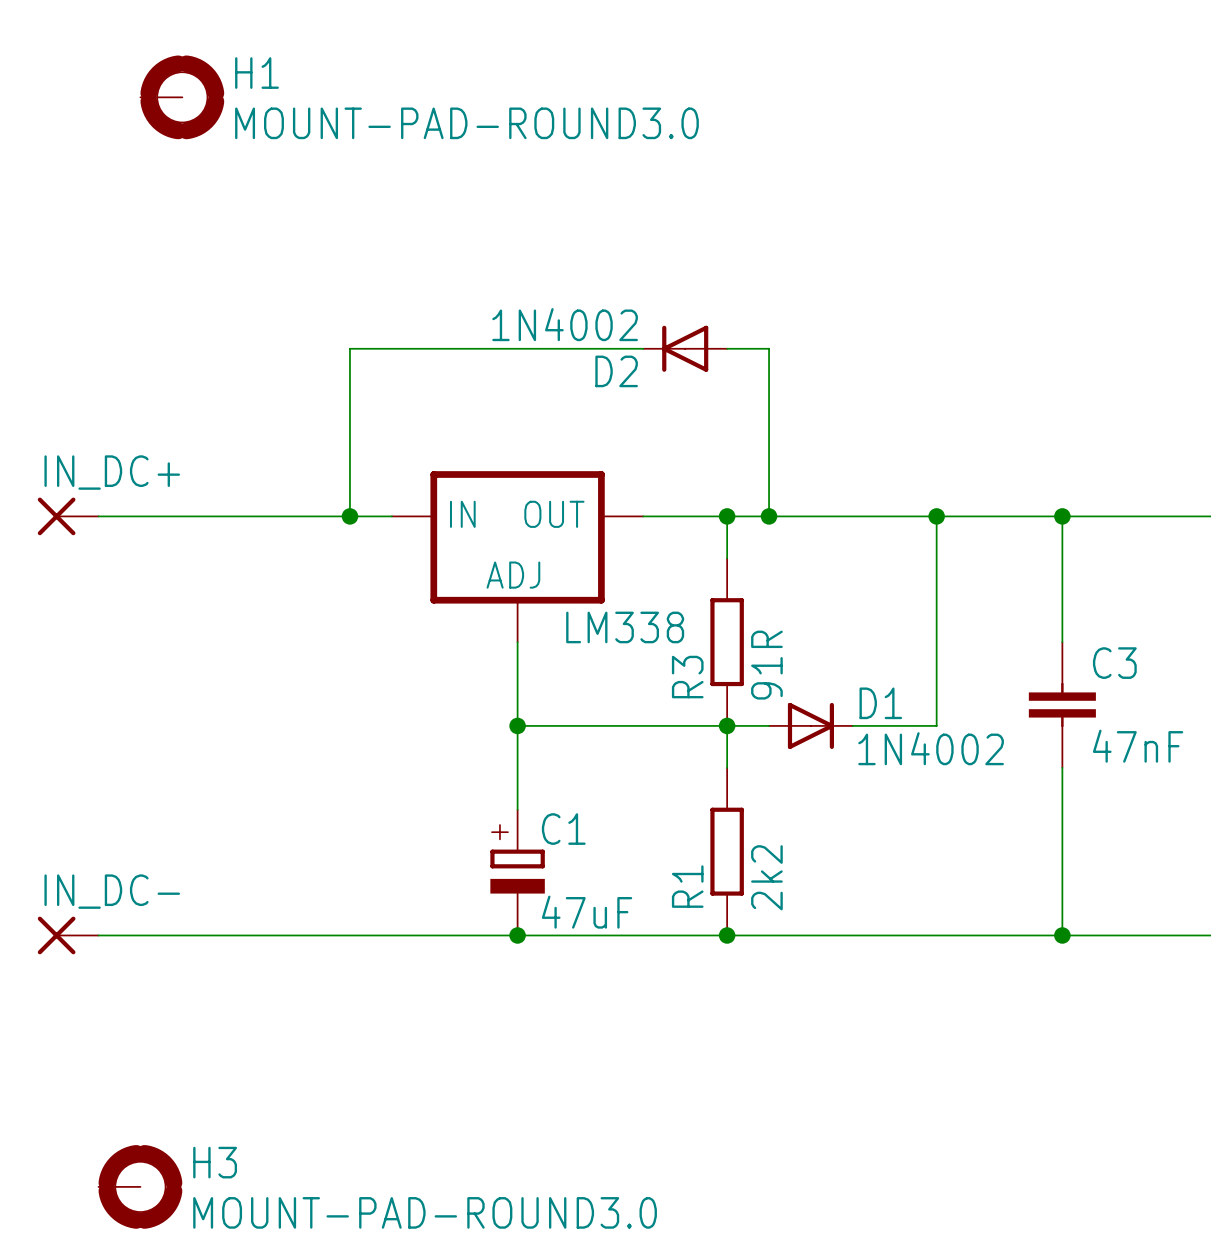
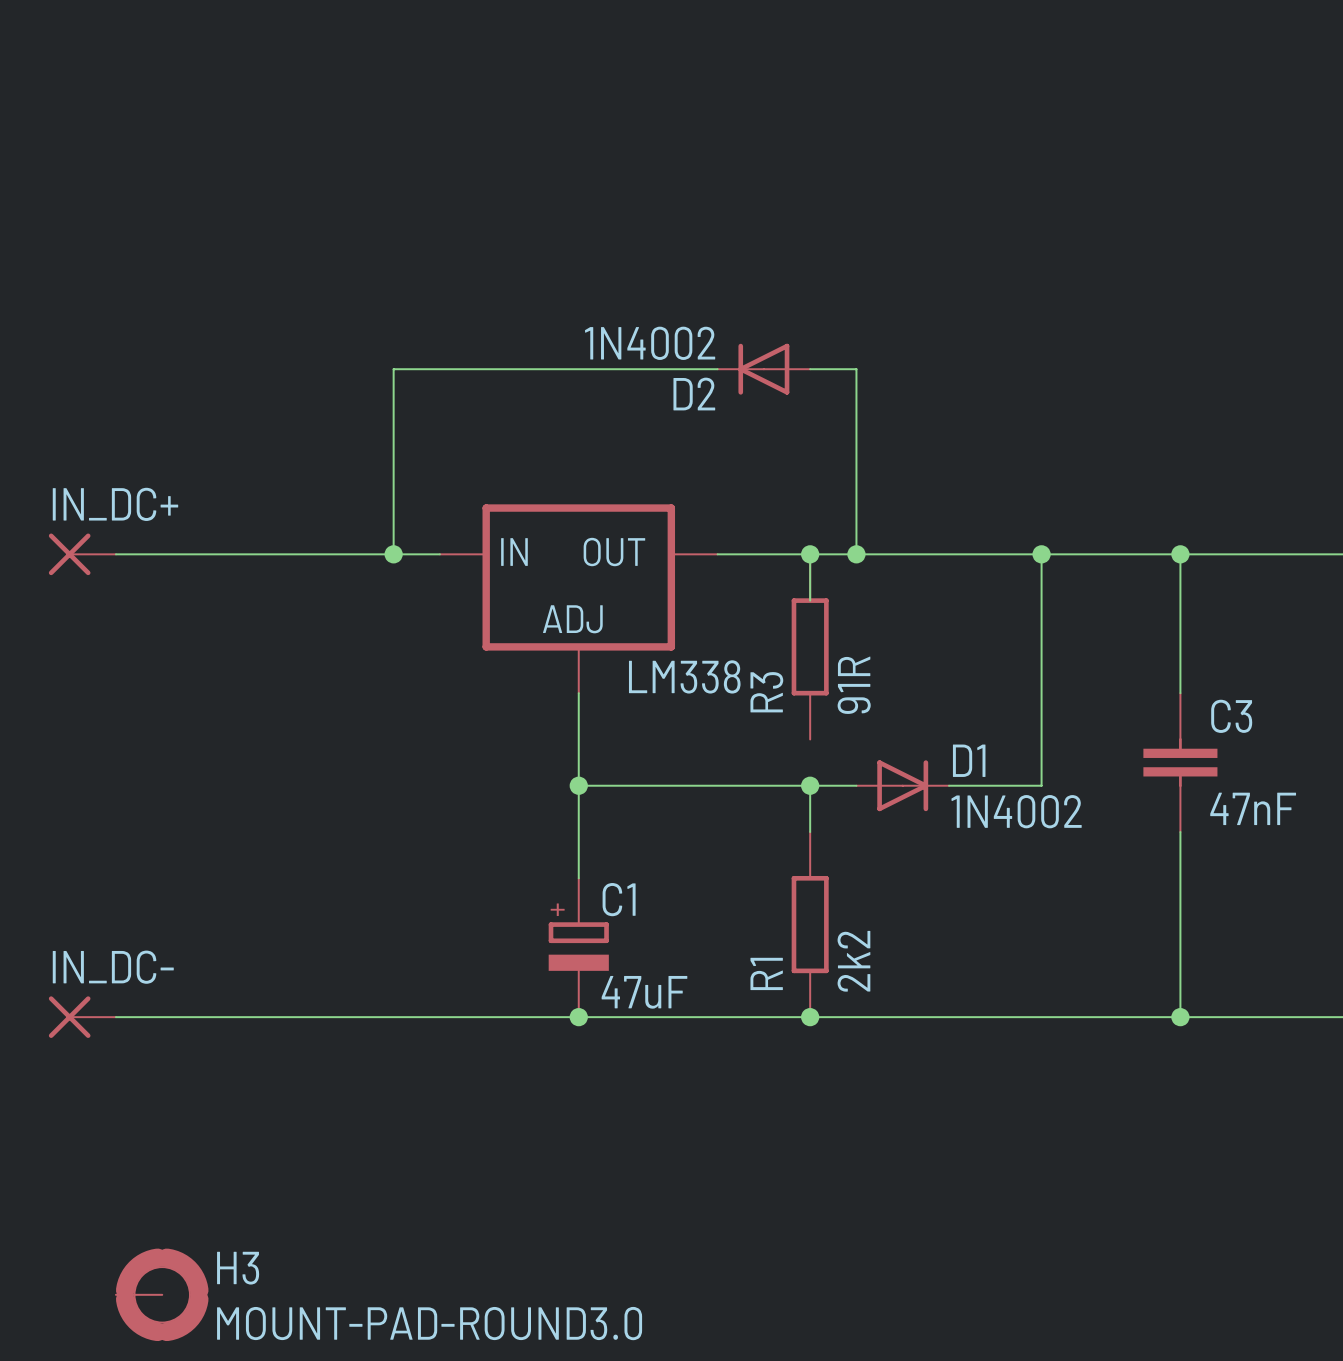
H1: MOUNT-PAD-ROUND3.0 (182, 97) -> none
R3 position: (727, 642) -> (810, 646)

